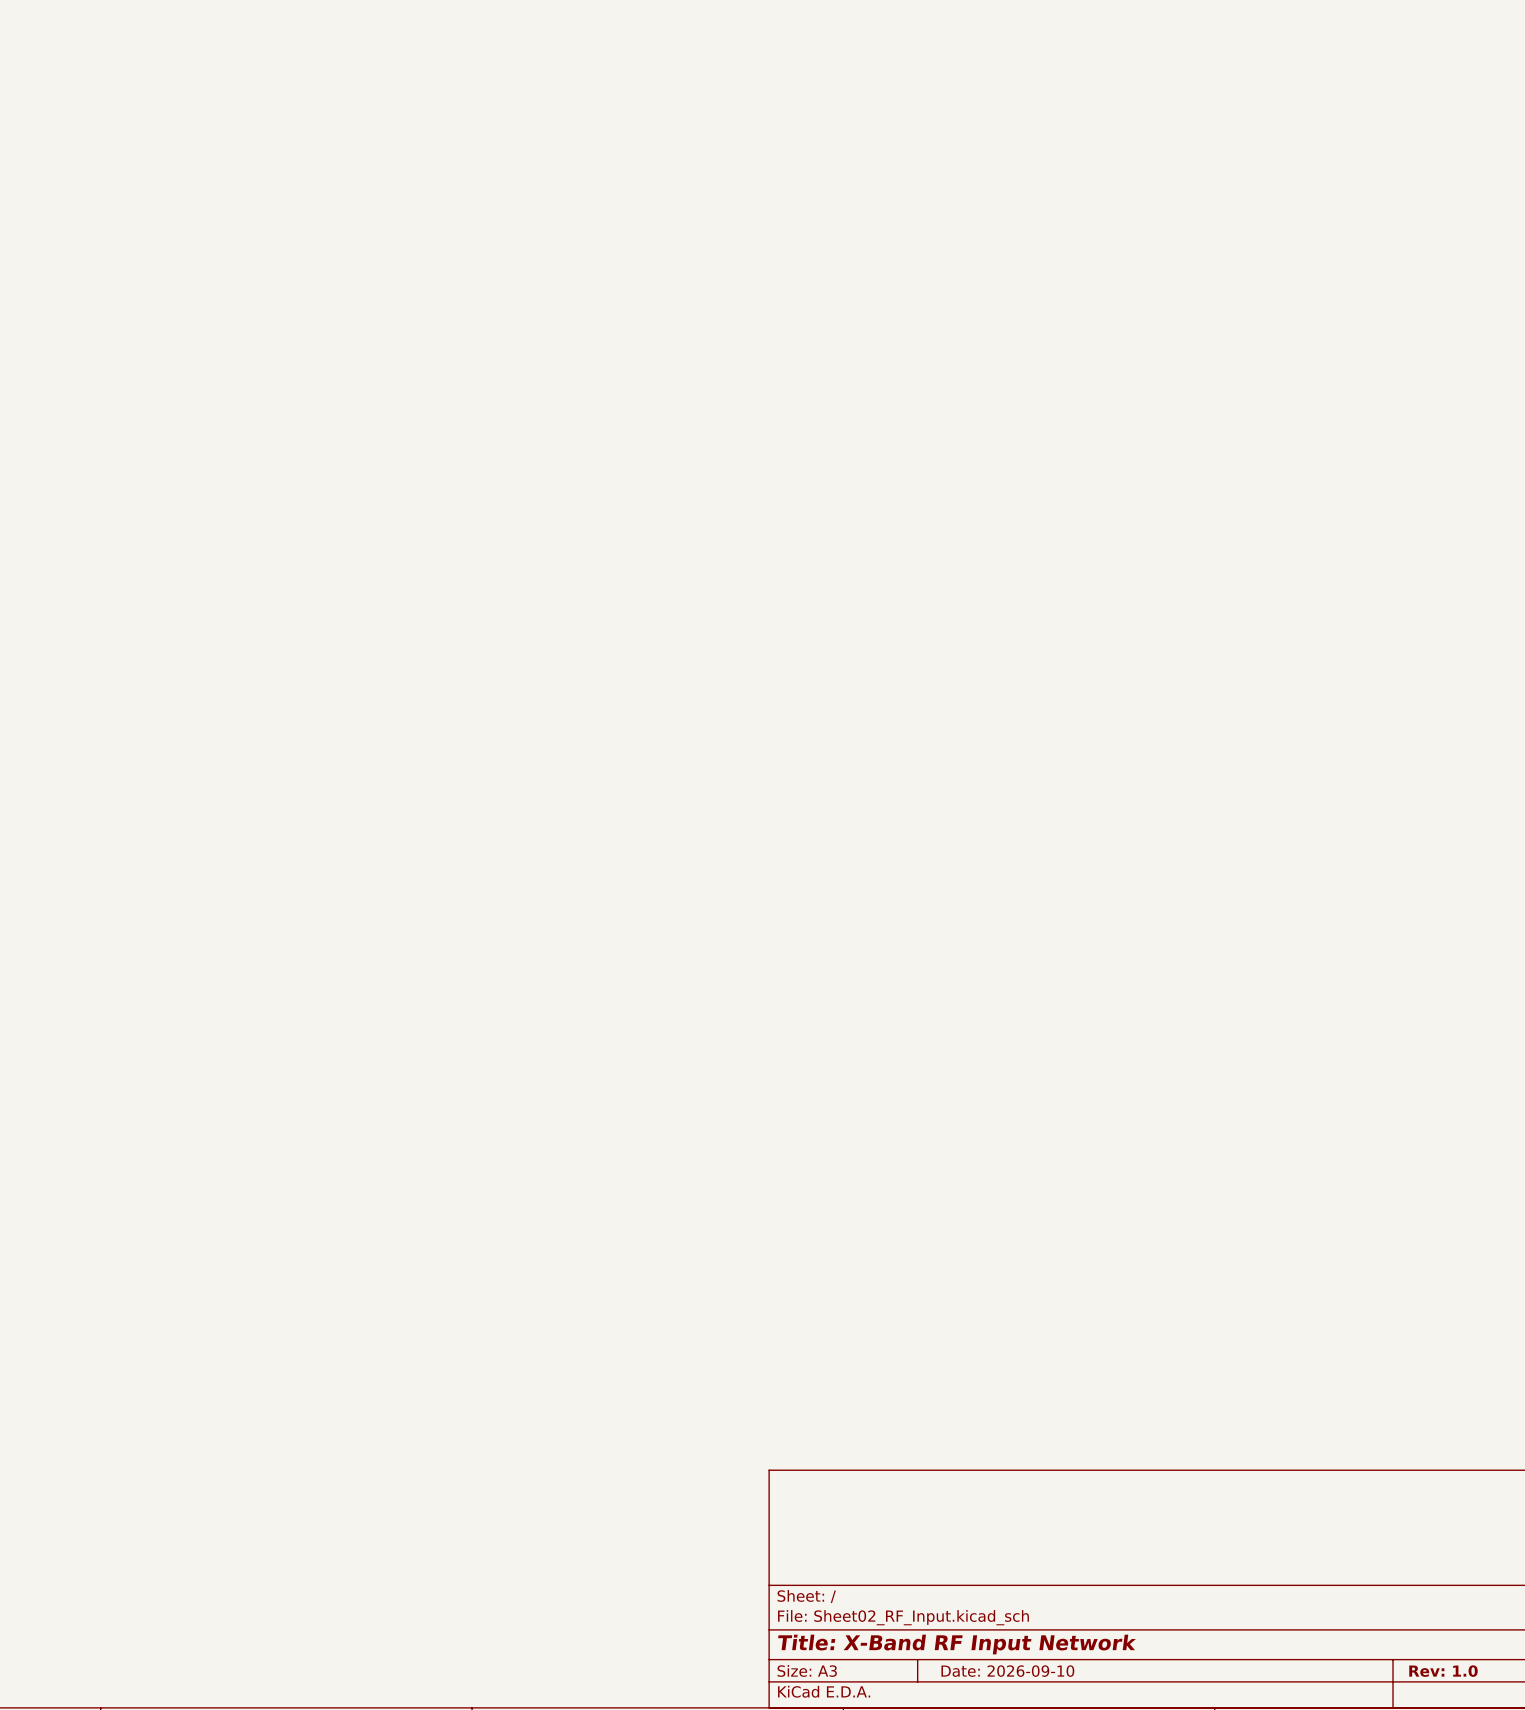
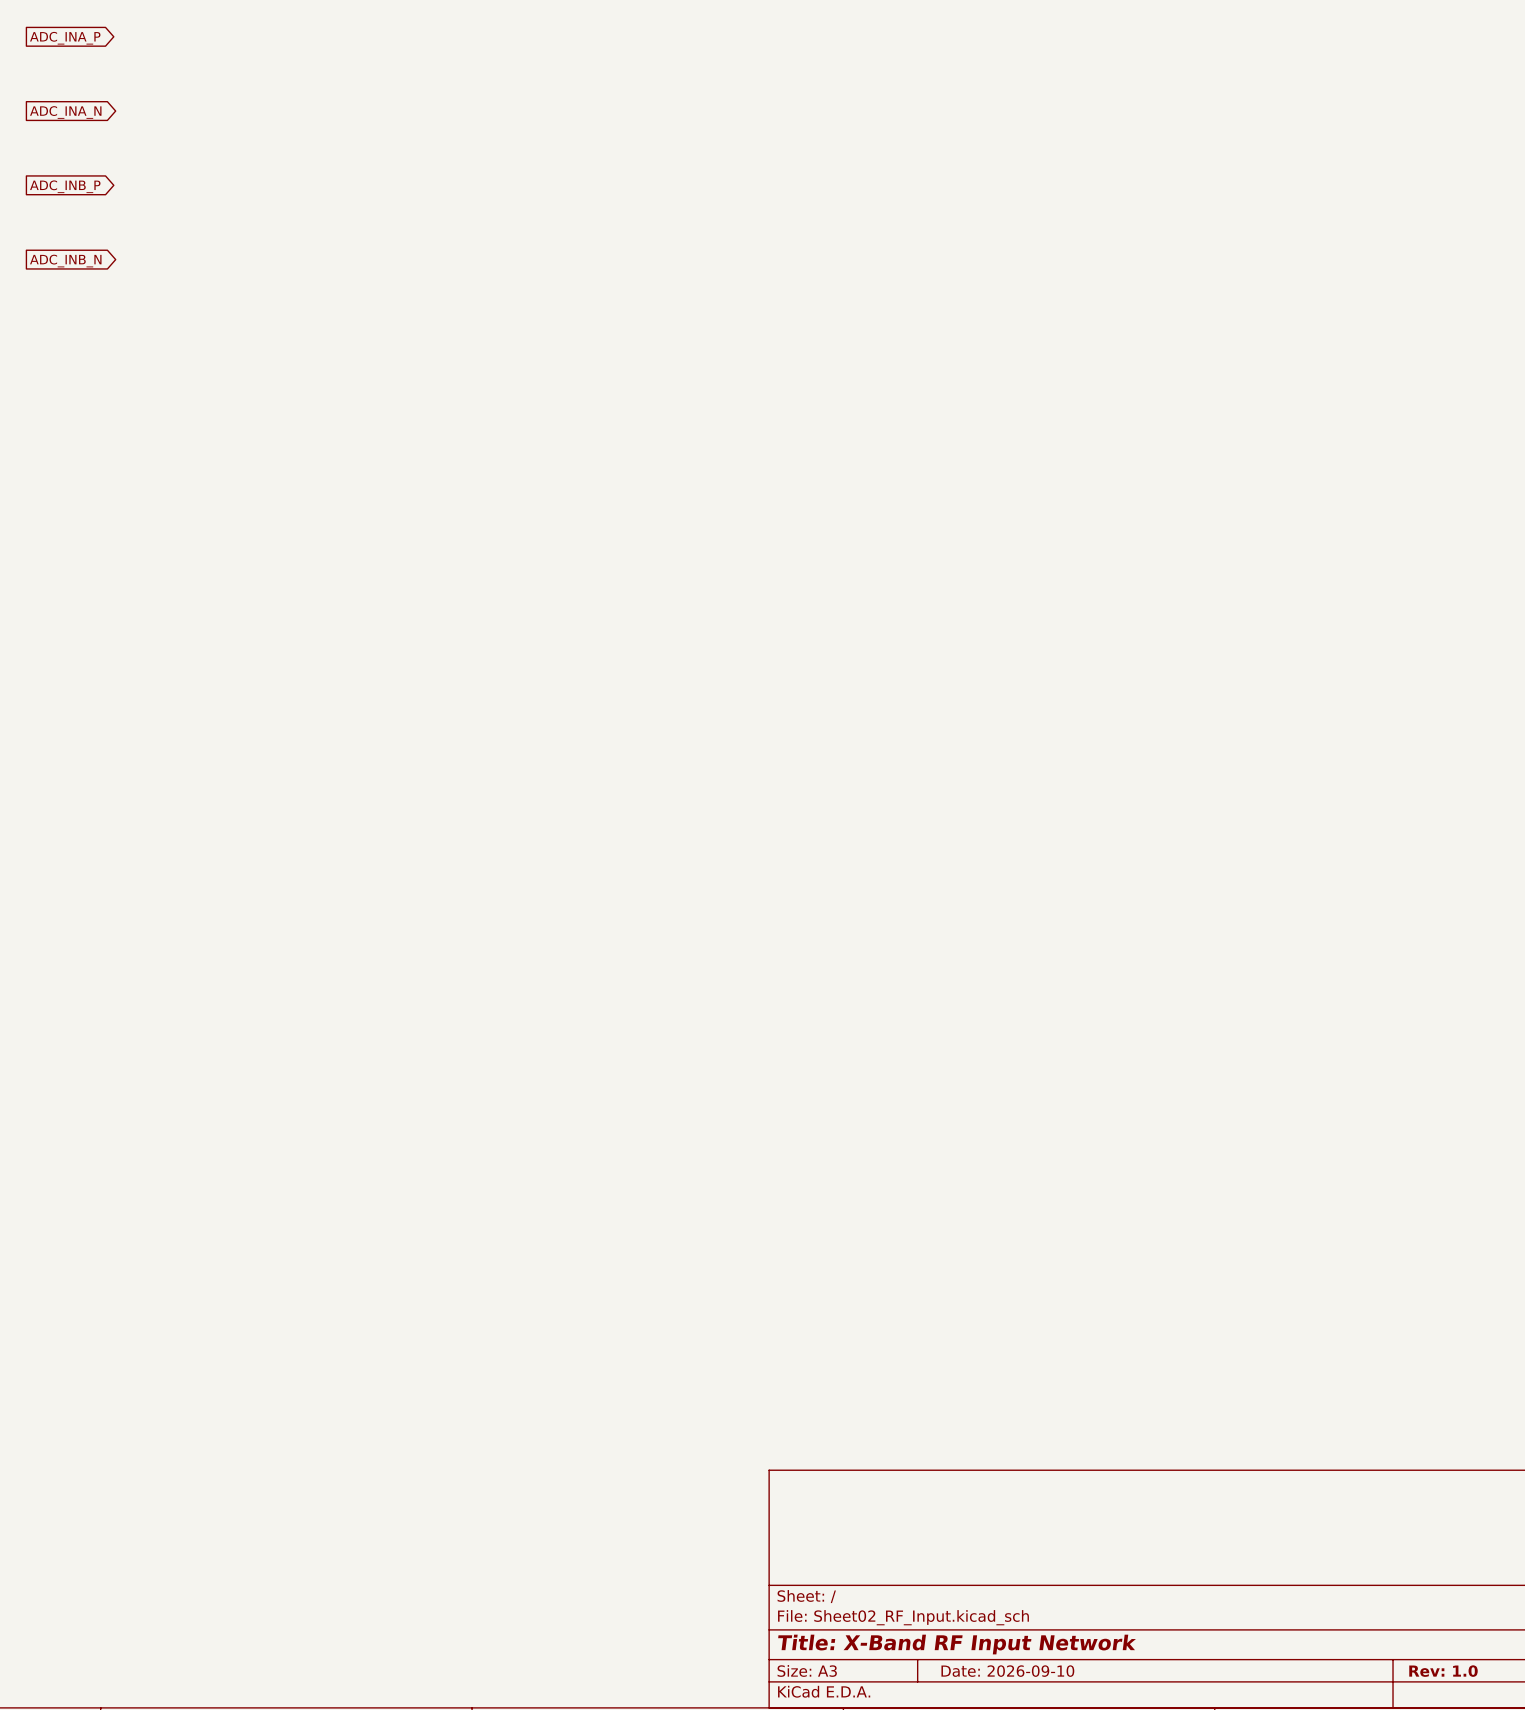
global label: none -> ADC_INA_P (65, 38)
global label: none -> ADC_INA_N (65, 112)
global label: none -> ADC_INB_P (65, 186)
global label: none -> ADC_INB_N (65, 261)

